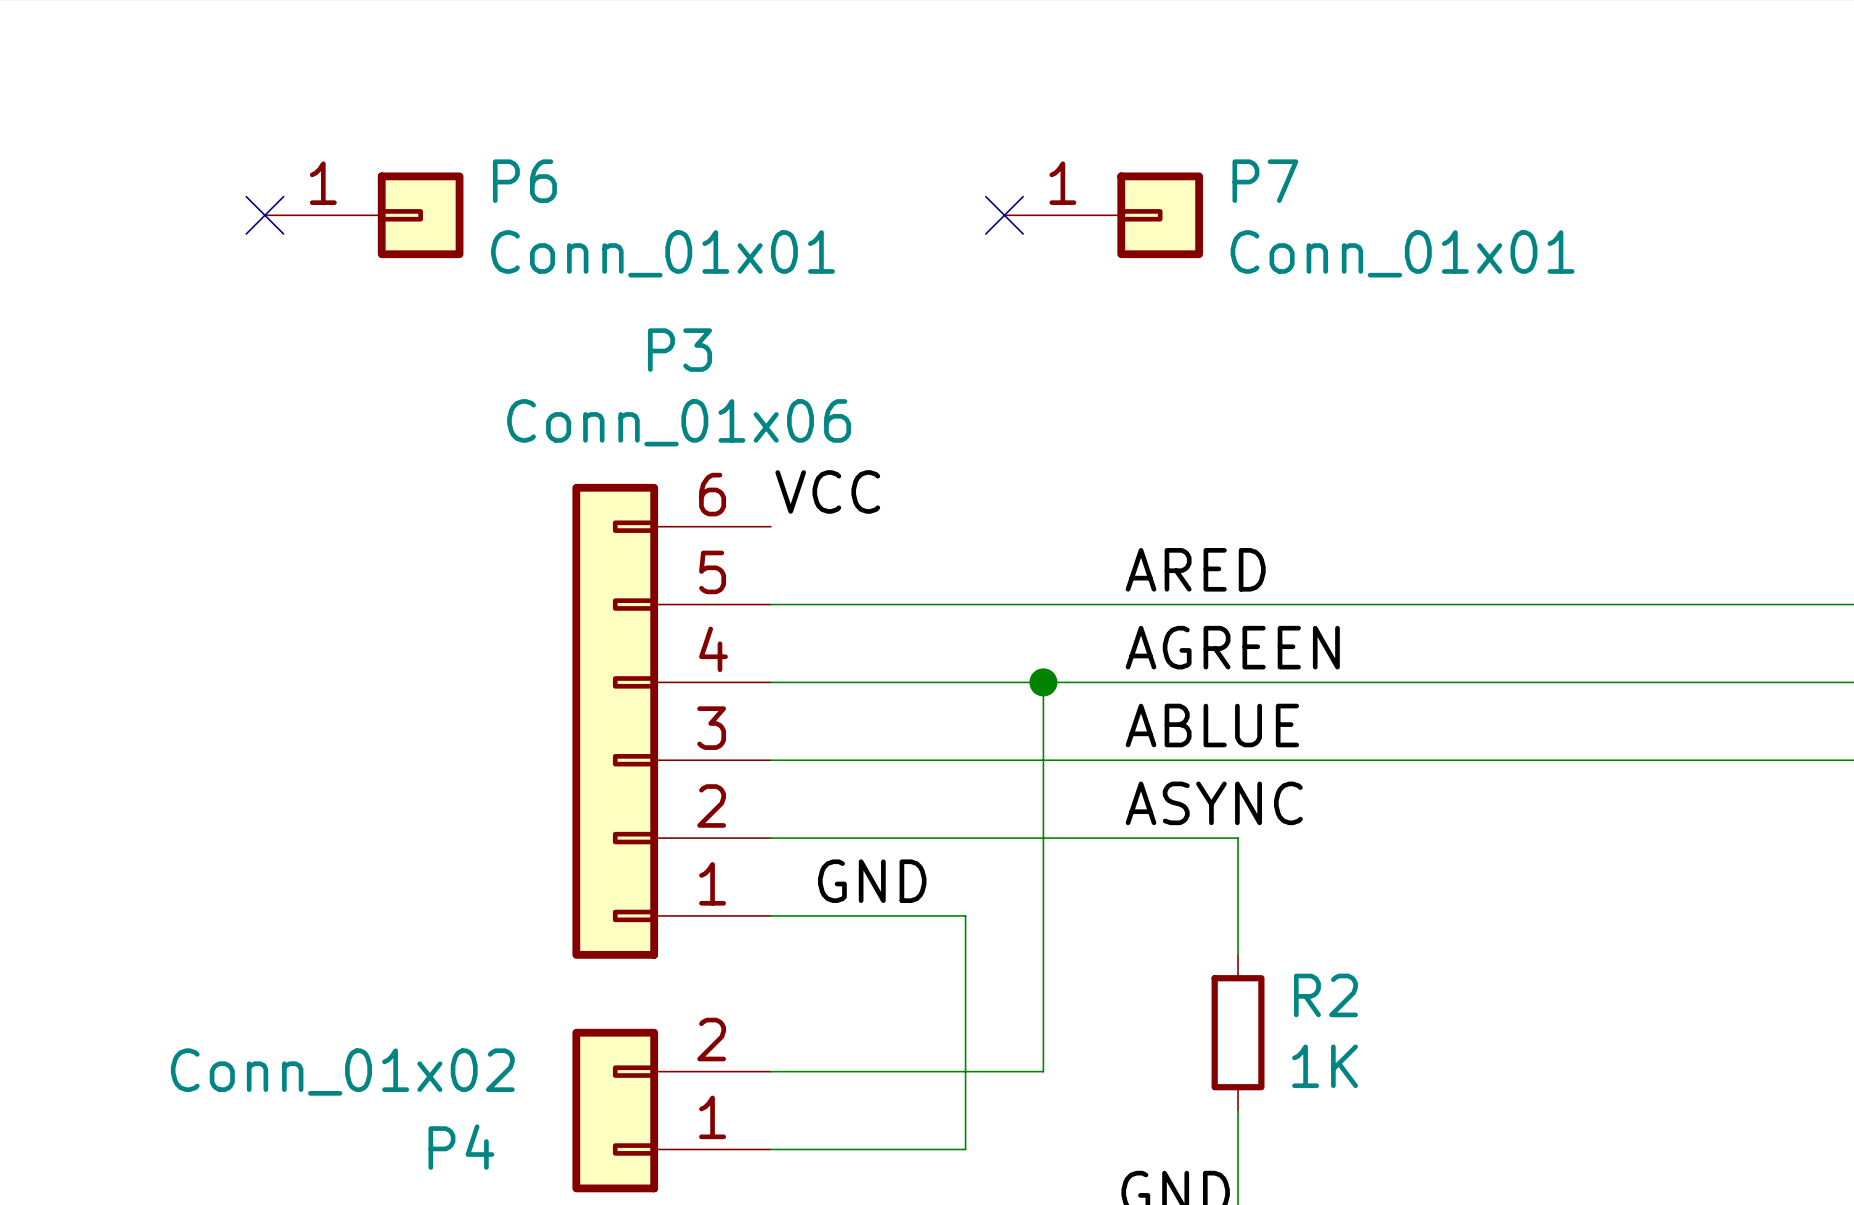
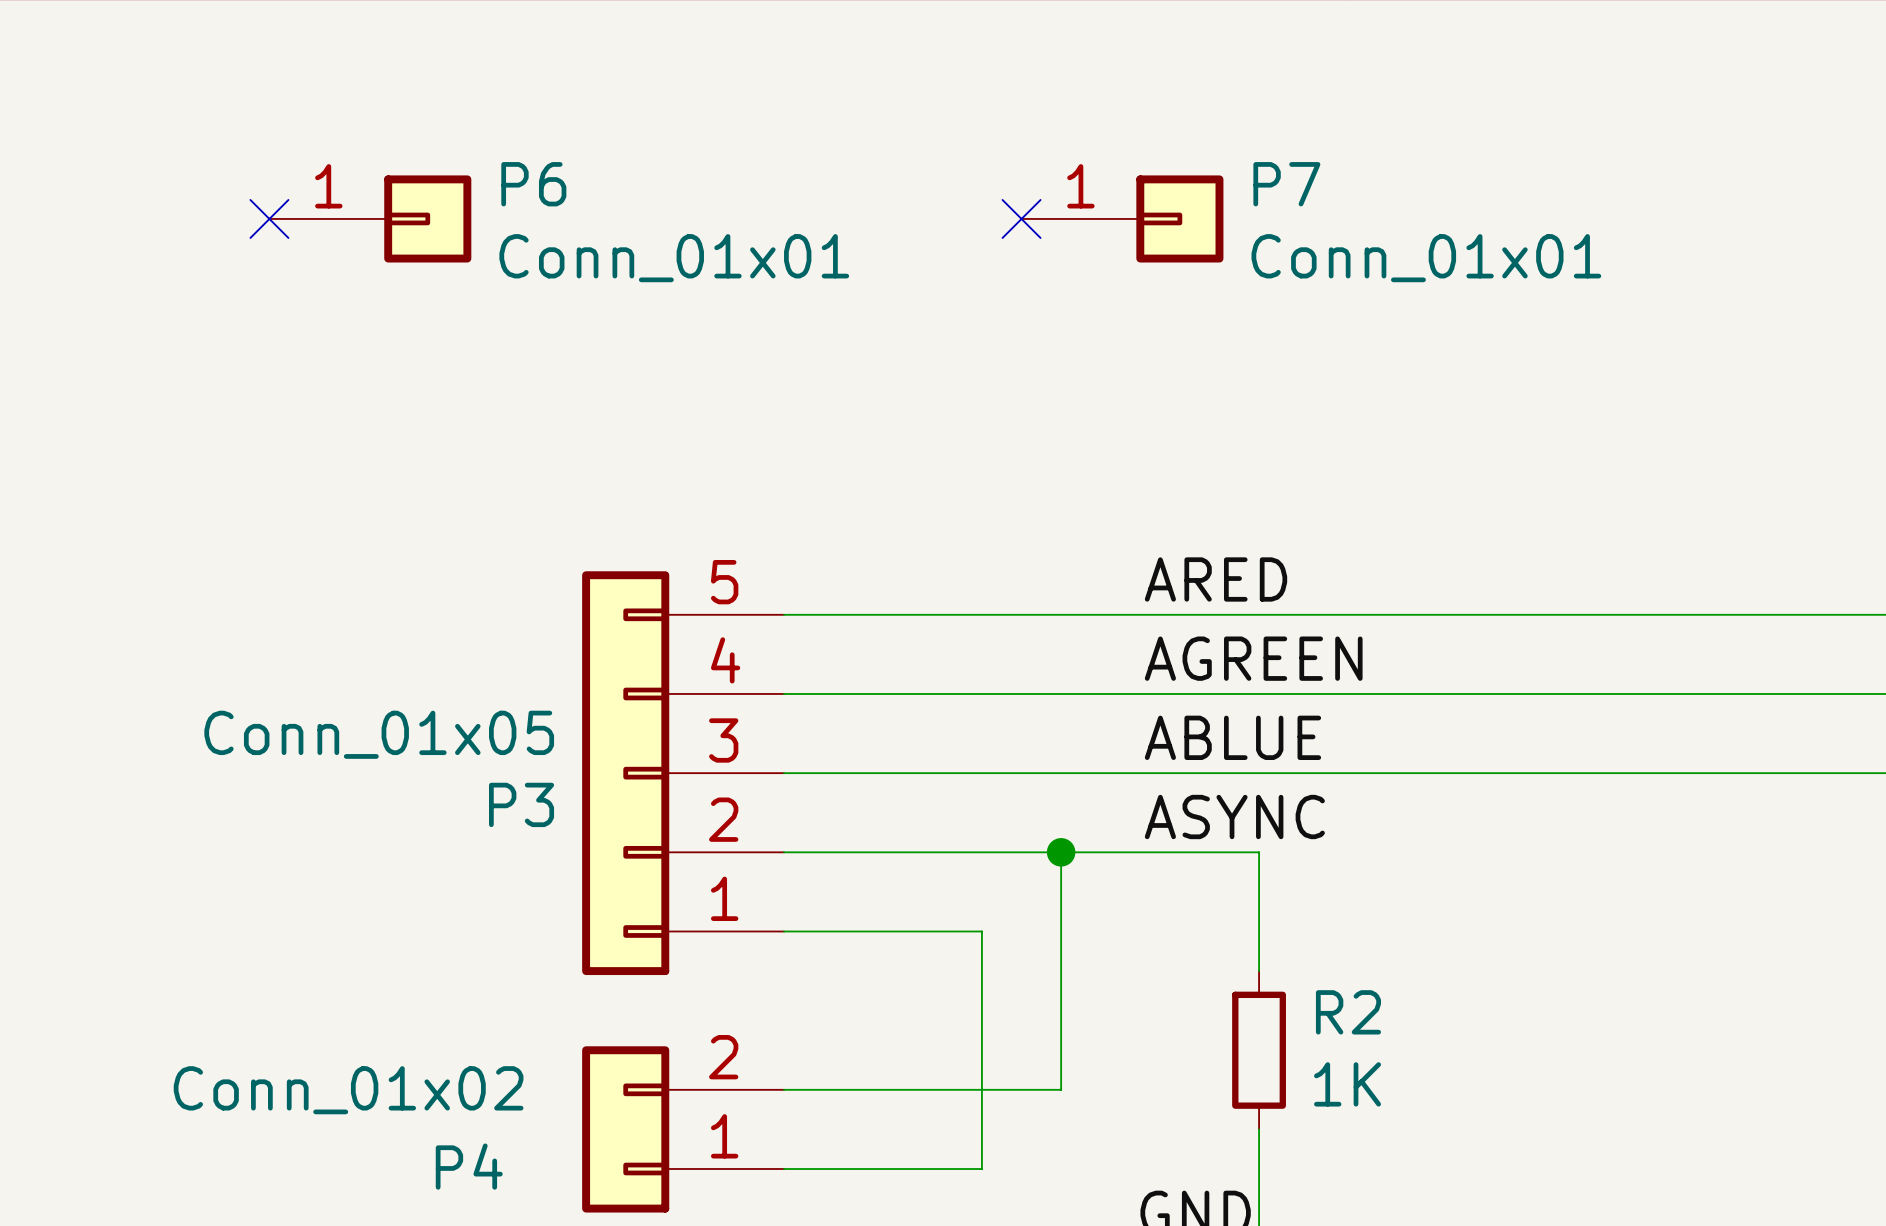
P3 name position: P3 (680, 350) -> P3 (521, 804)
P3 value: Conn_01x06 (679, 422) -> Conn_01x05 (379, 734)
P3 symbol: [572, 483, 771, 959] -> [582, 571, 785, 976]
label: VCC (827, 491) -> none
wire: (1043, 682) (1043, 838) -> none
junction position: (1043, 682) -> (1061, 852)
label: GND (872, 881) -> none

